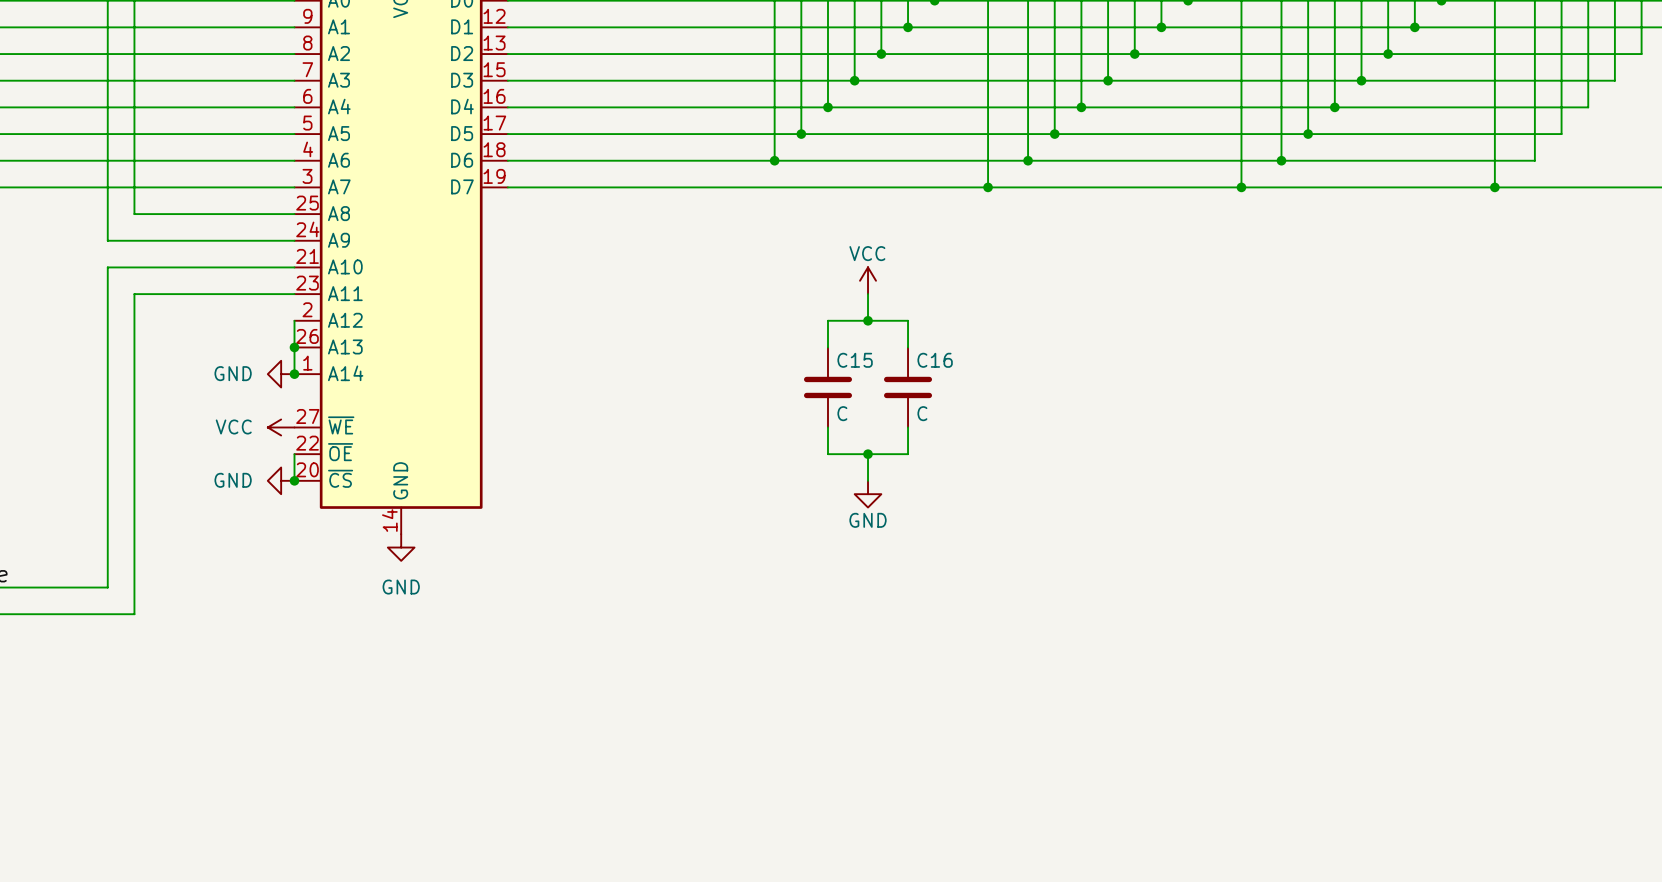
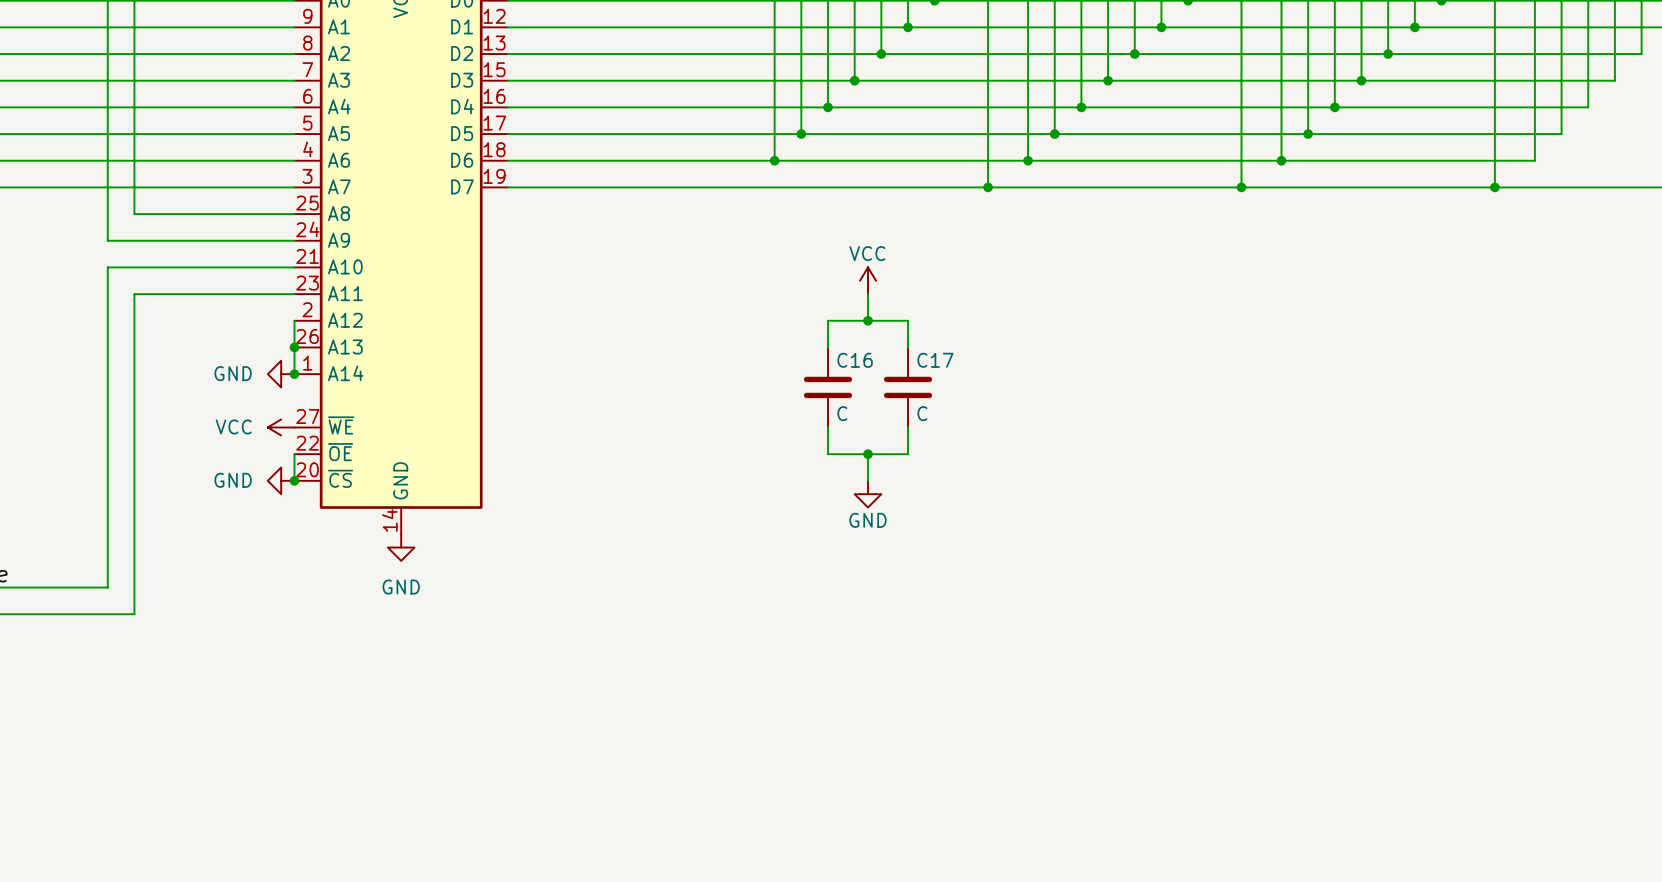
C15 name: C15 (855, 360) -> C16 (855, 360)
C16 name: C16 (935, 360) -> C17 (935, 360)

